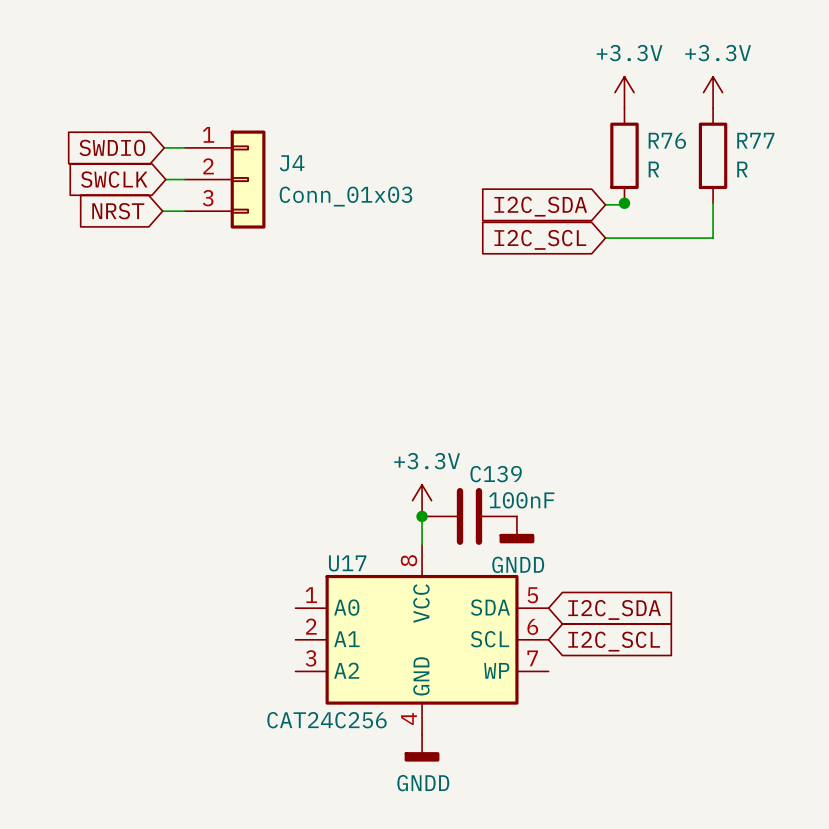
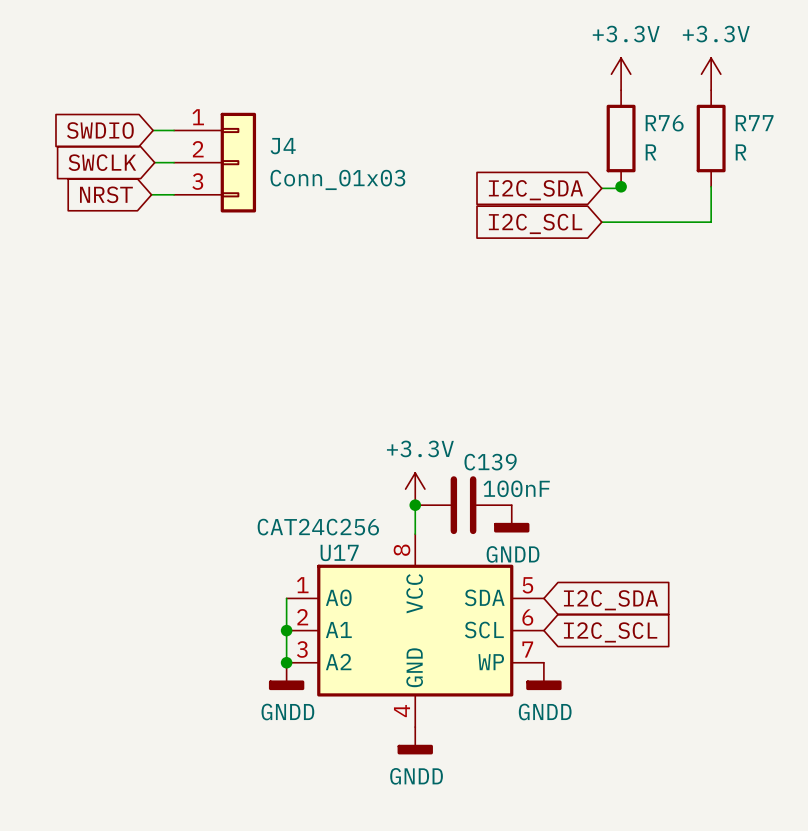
wire: none -> (286, 598) (286, 662)
junction: none -> (286, 630)
junction: none -> (286, 662)
power symbol: none -> GNDD (286, 676)
power symbol: none -> GNDD (543, 676)
U17 value position: CAT24C256 (327, 720) -> CAT24C256 (318, 527)

